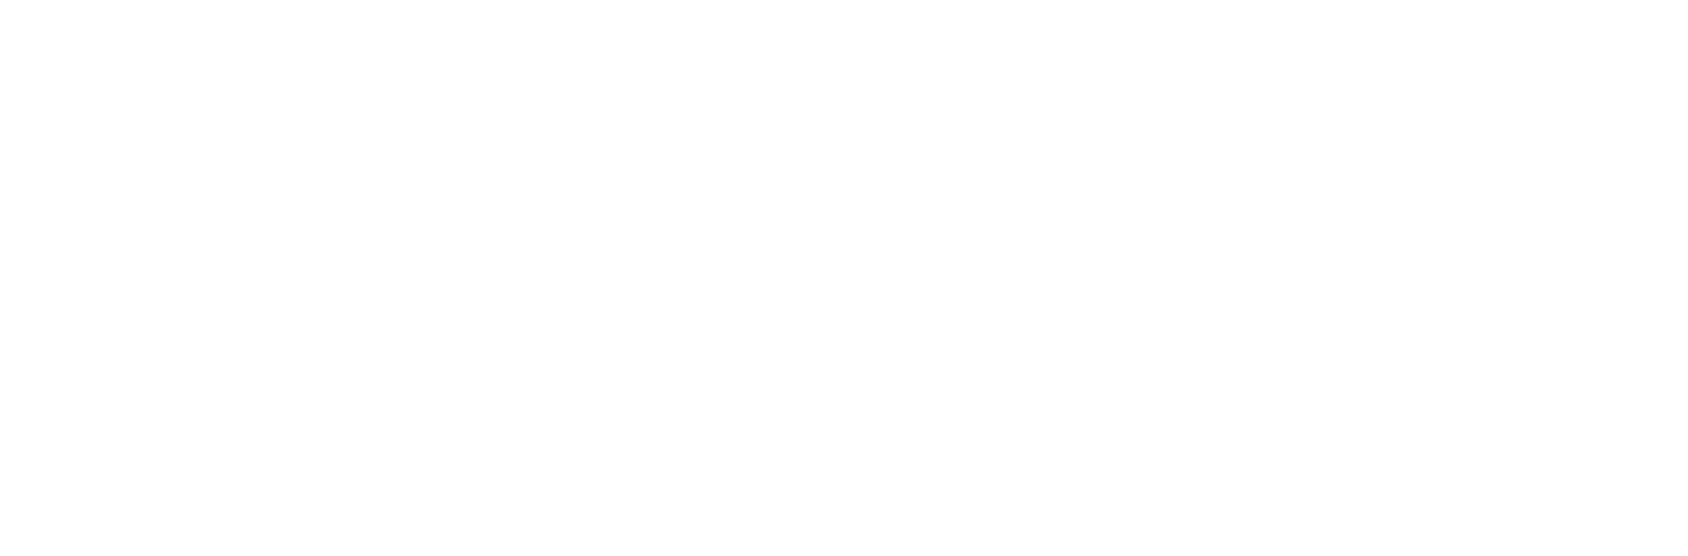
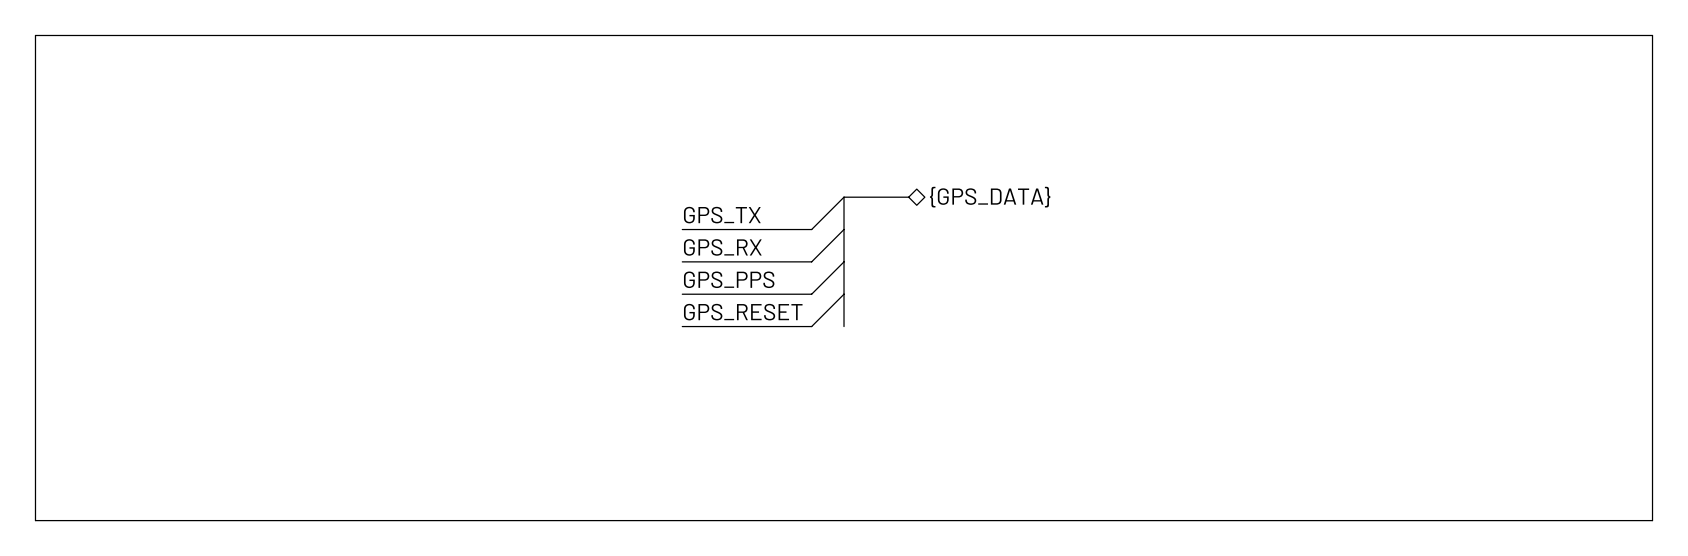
line: none -> (35, 35) (1652, 35) (1652, 520) (35, 520) (35, 35)
wire: none -> (844, 197) (811, 229) (682, 229)
bus: none -> (908, 197) (844, 197) (844, 326)
hierarchical label: none -> {GPS_DATA} (990, 197)
label: none -> GPS_TX (722, 215)
wire: none -> (844, 229) (811, 261) (682, 261)
label: none -> GPS_RX (722, 247)
wire: none -> (844, 261) (811, 294) (682, 294)
label: none -> GPS_PPS (729, 279)
wire: none -> (844, 294) (811, 326) (682, 326)
label: none -> GPS_RESET (743, 312)

